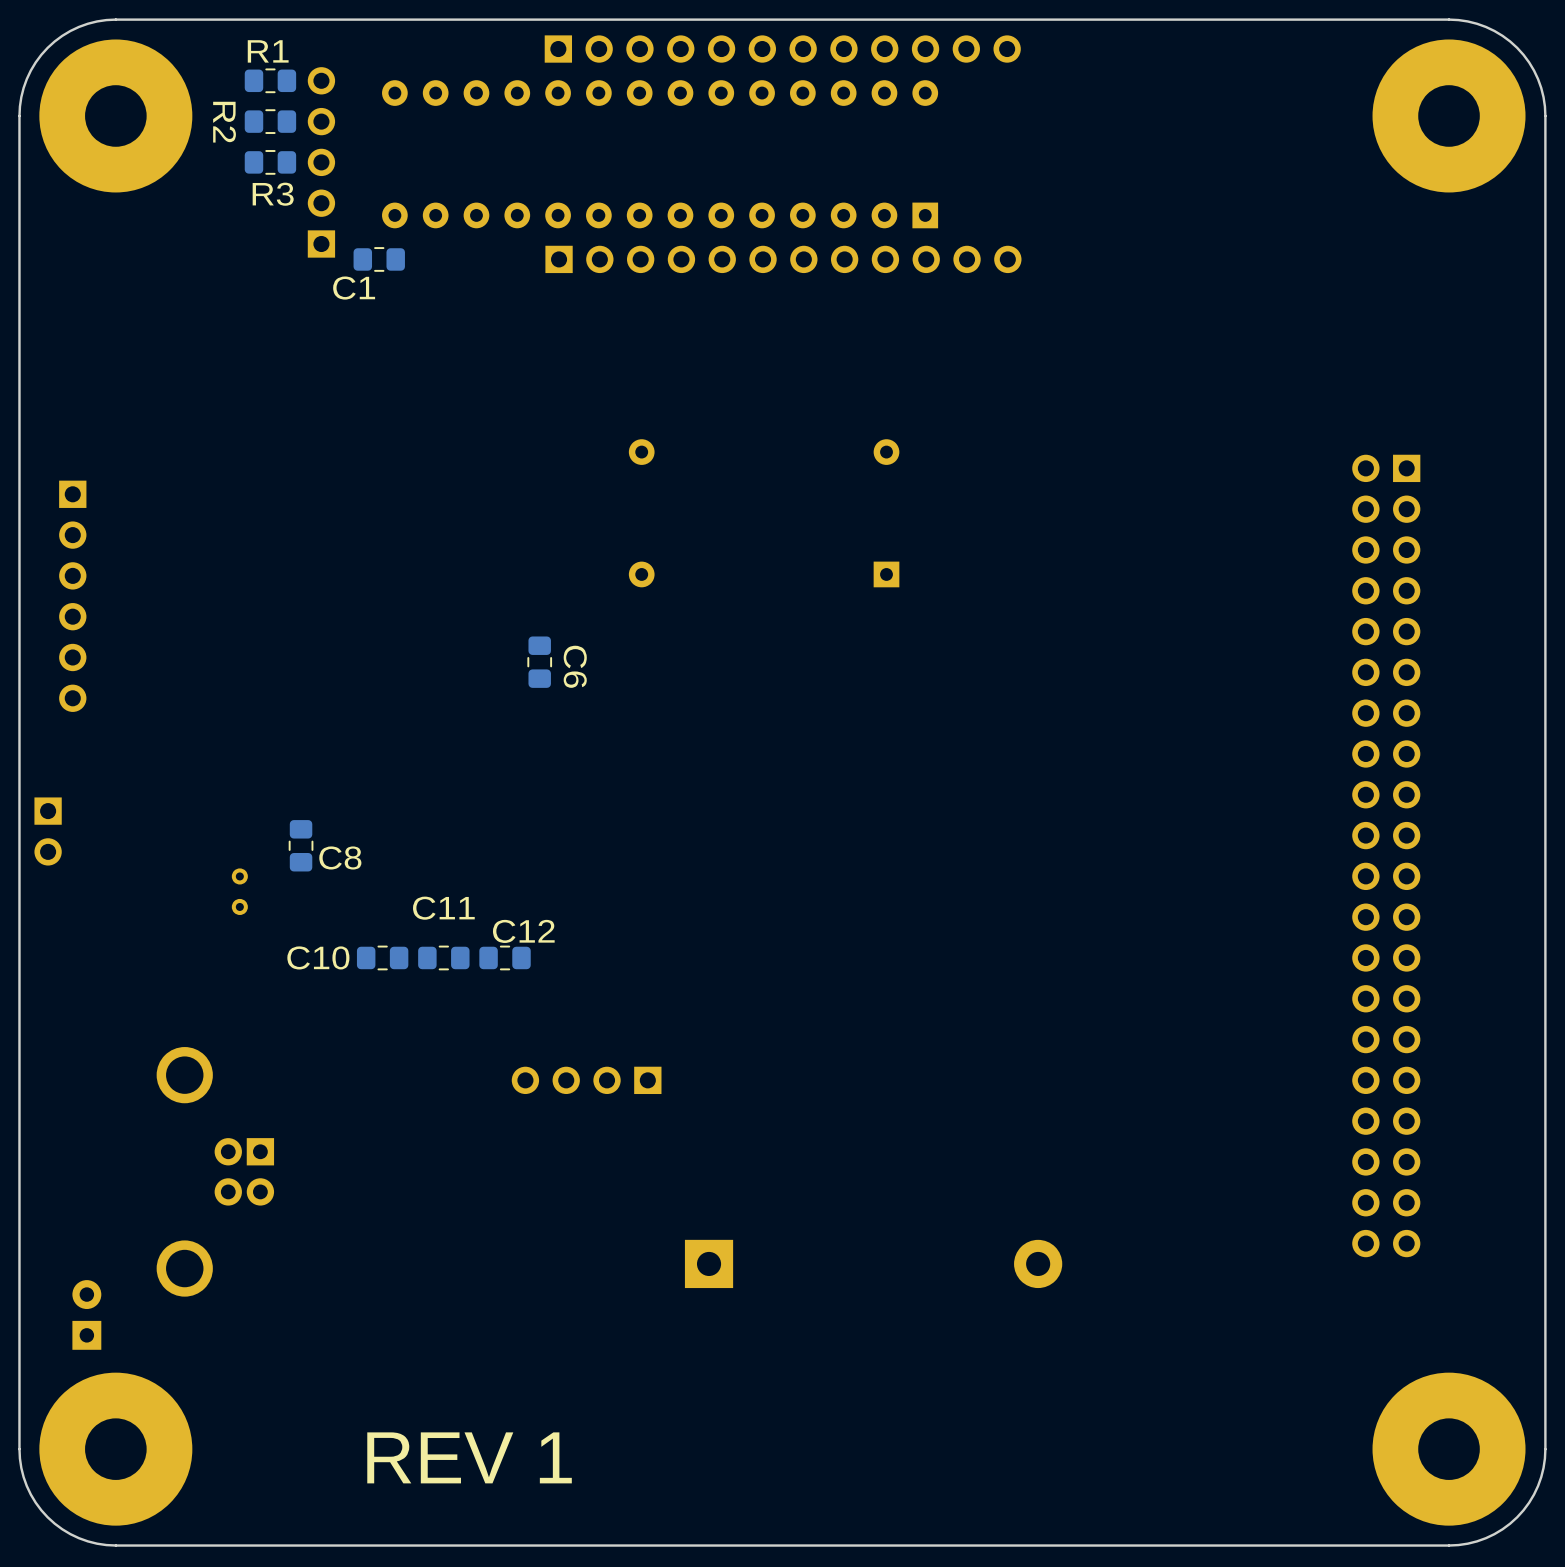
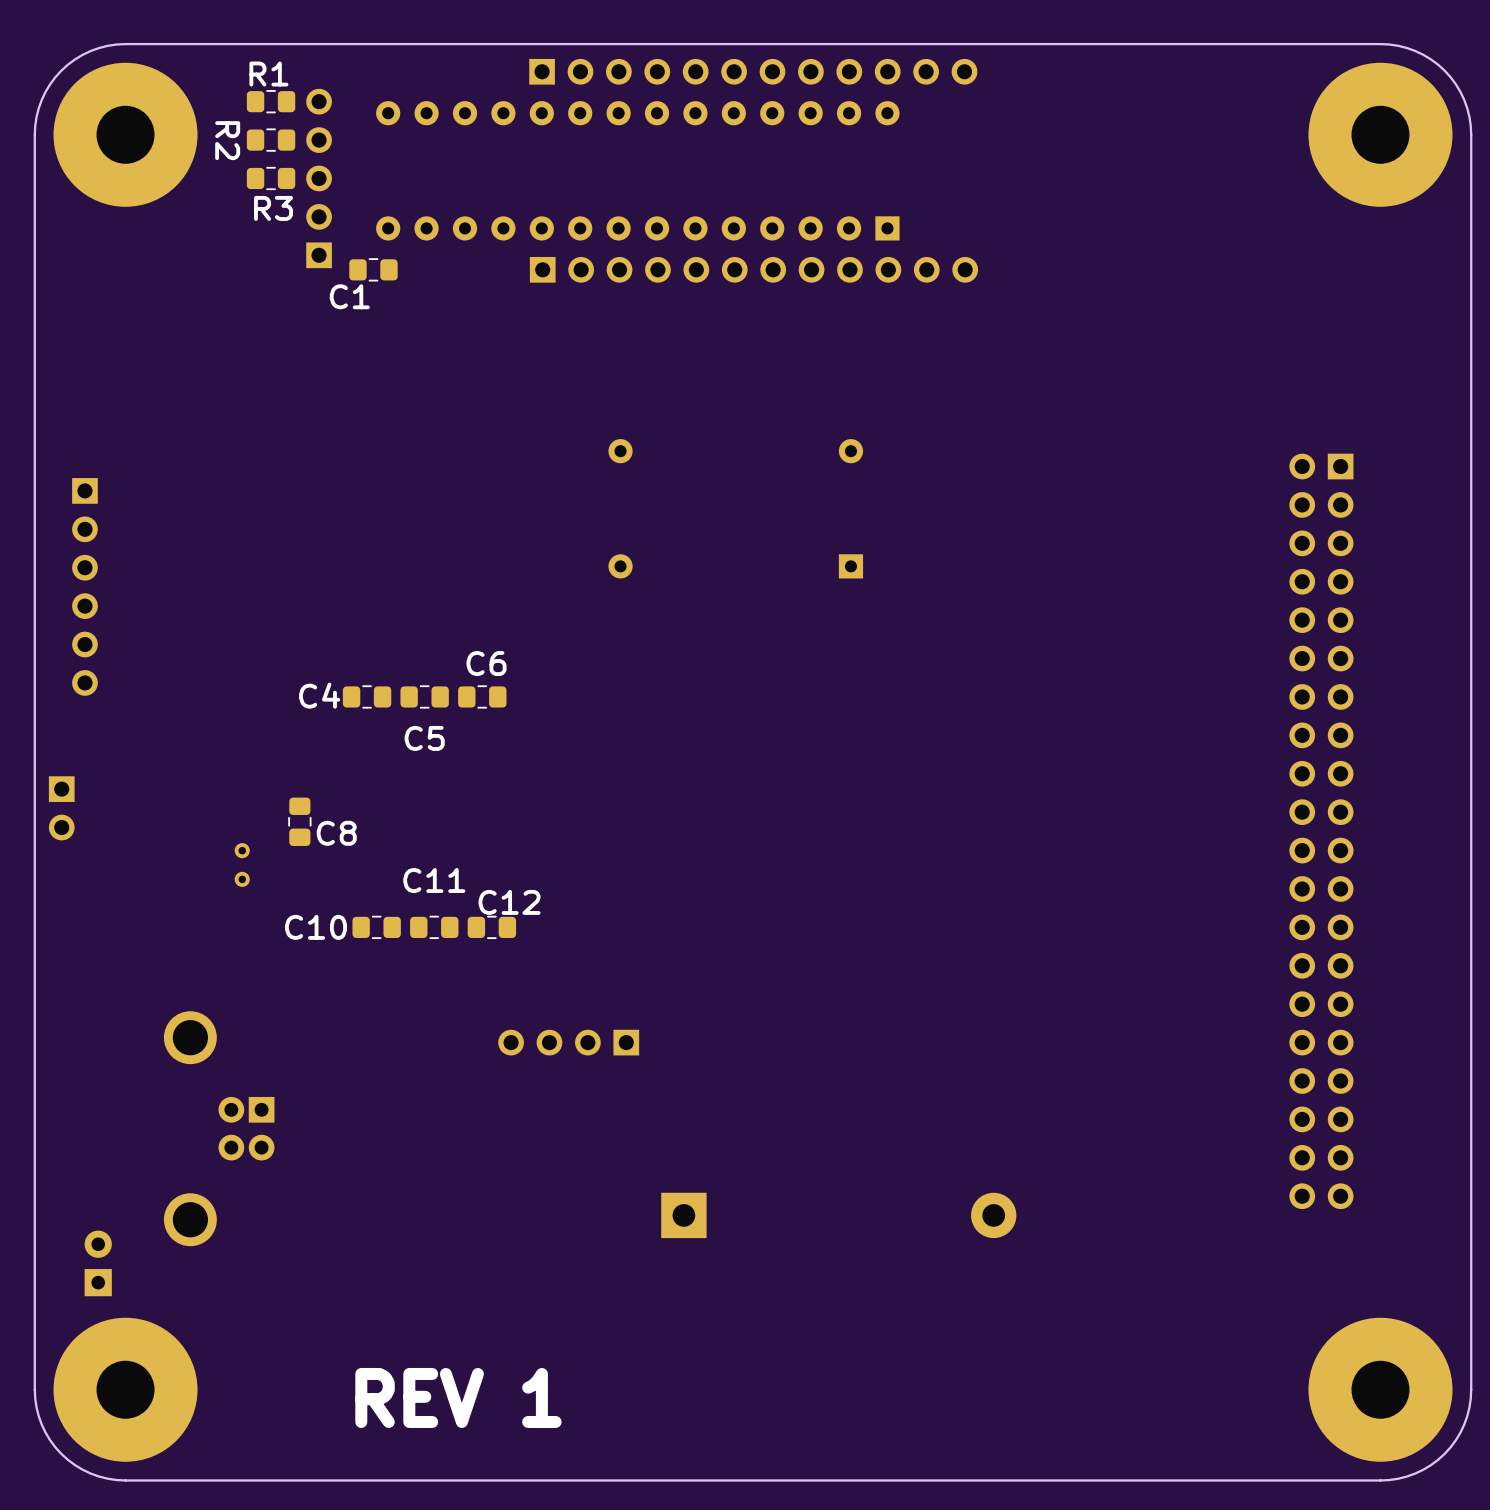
C6 rotation: 0° (539, 662) -> 90° clockwise (482, 696)
C6 position: (539, 662) -> (482, 696)
C6 name position: C6 (575, 666) -> C6 (486, 663)
C4: none -> (367, 696)
C5: none -> (424, 696)

